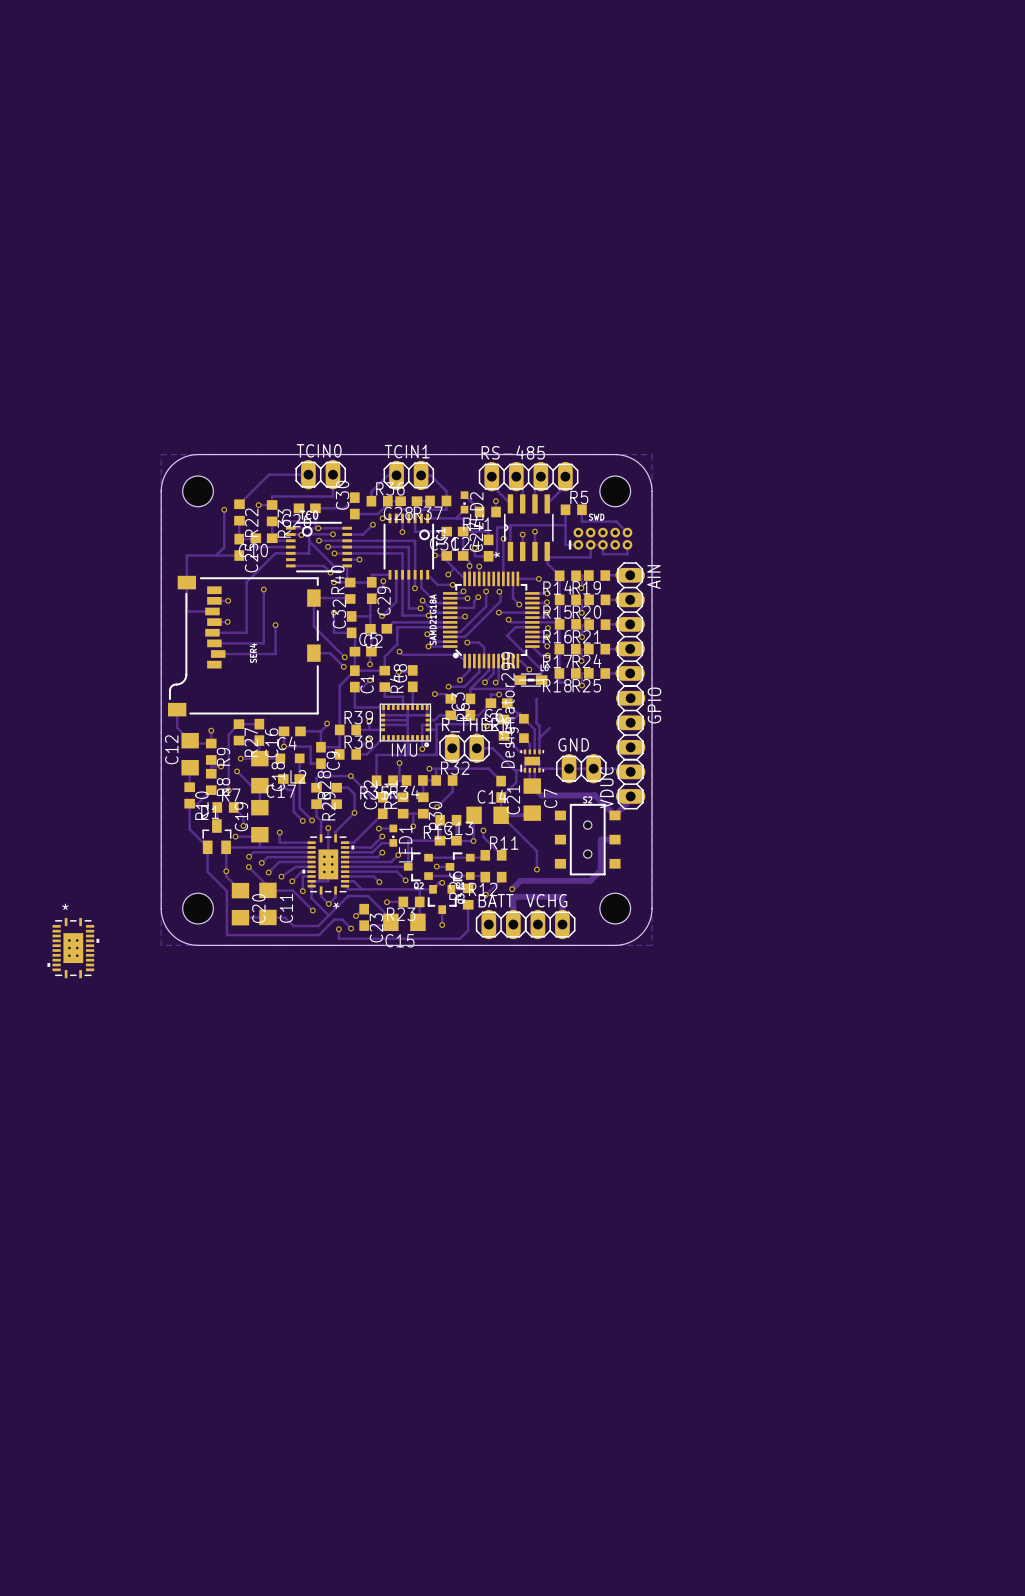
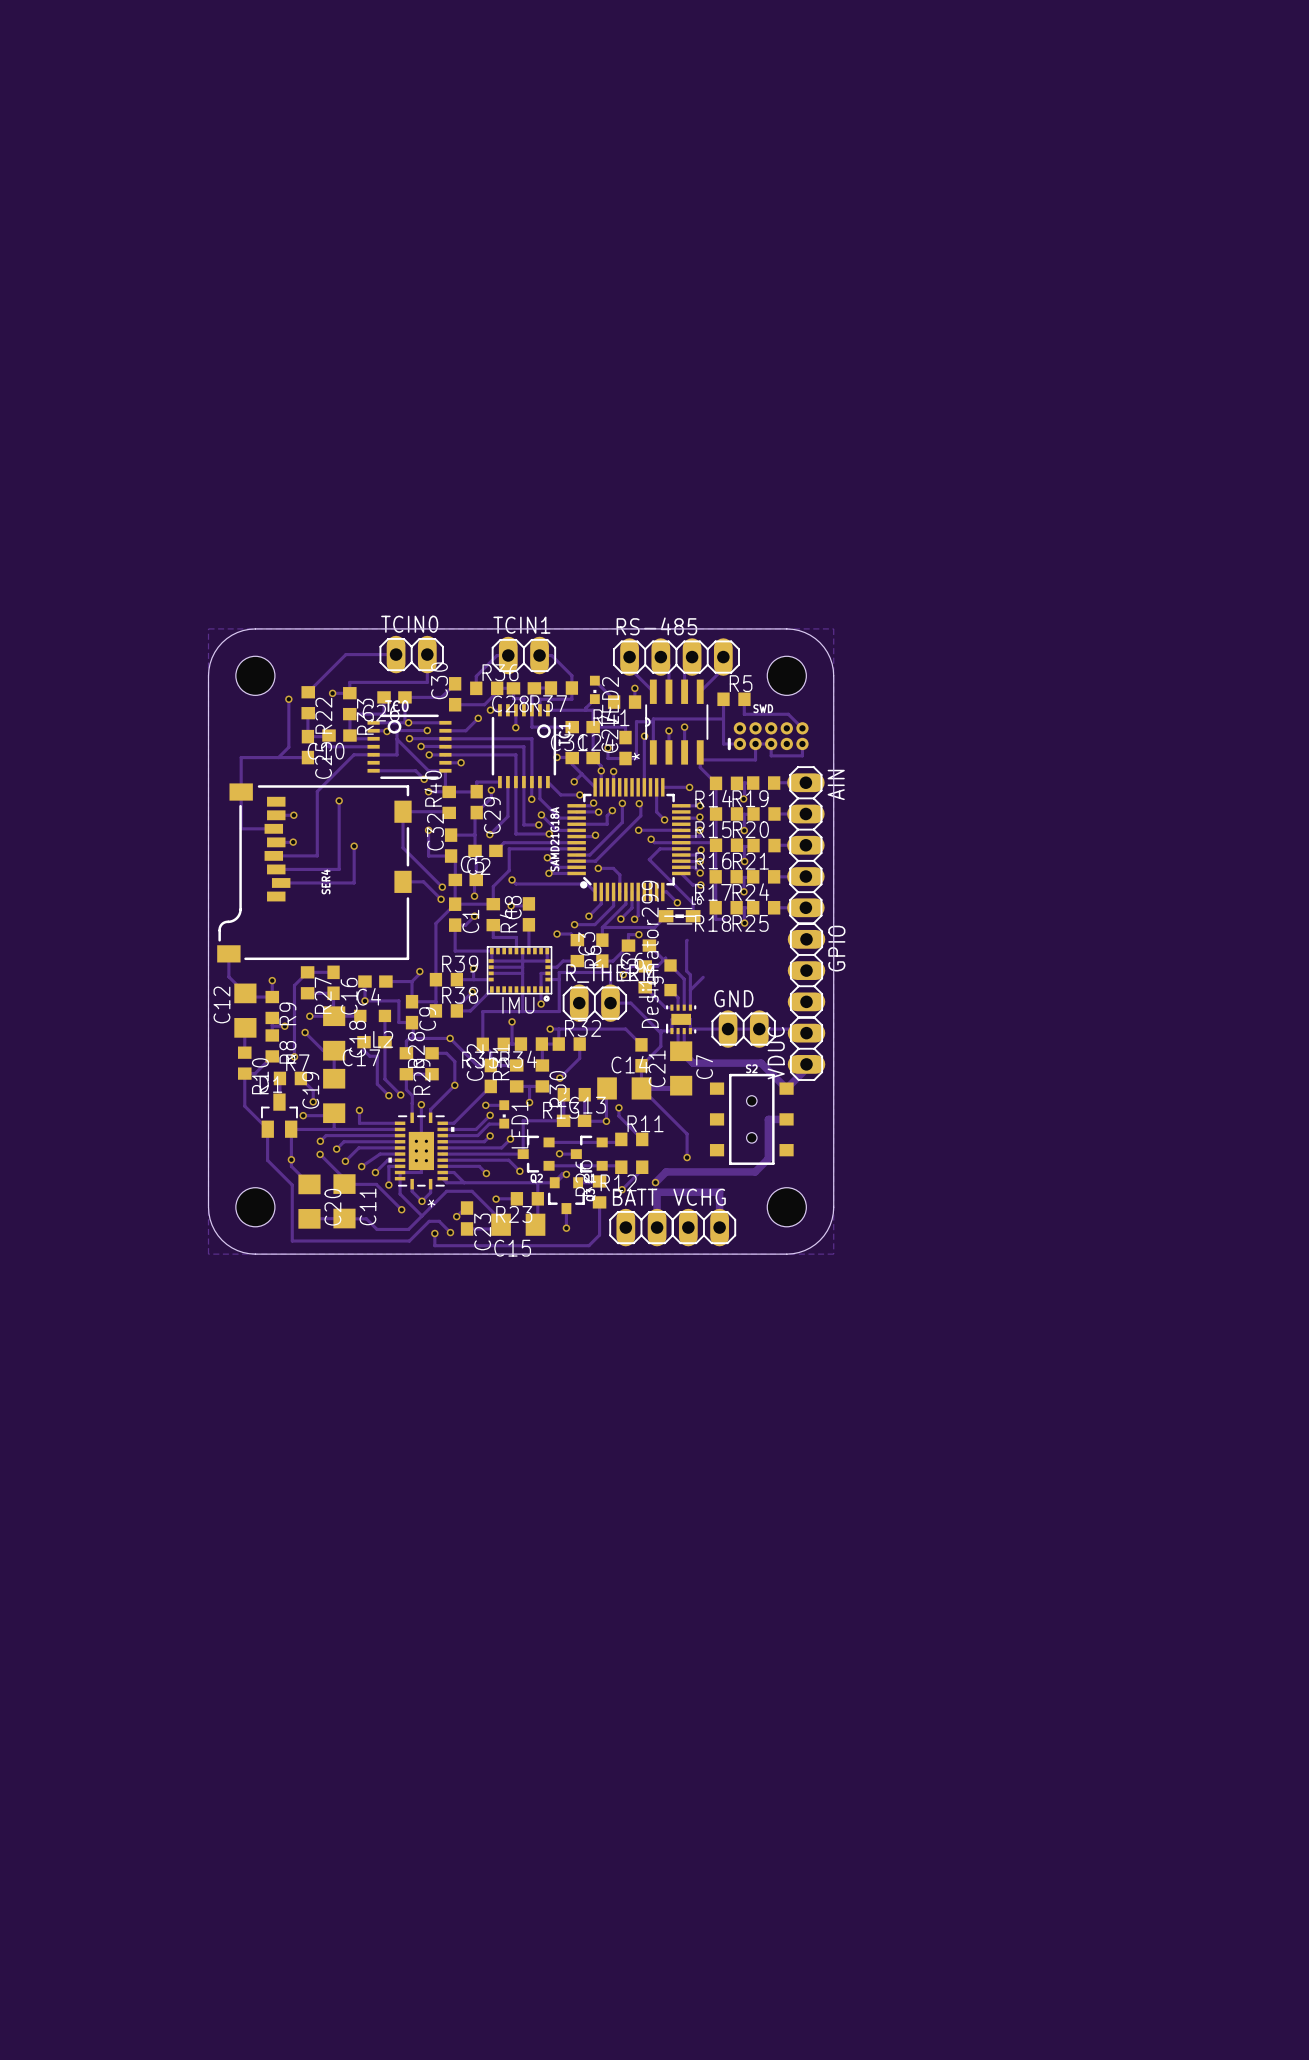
part: (73, 948) -> none

